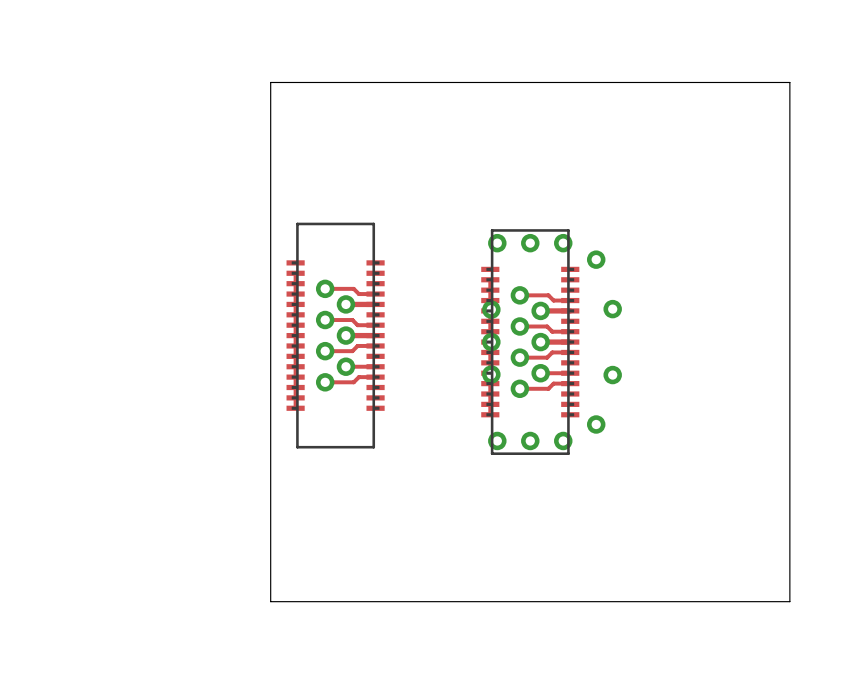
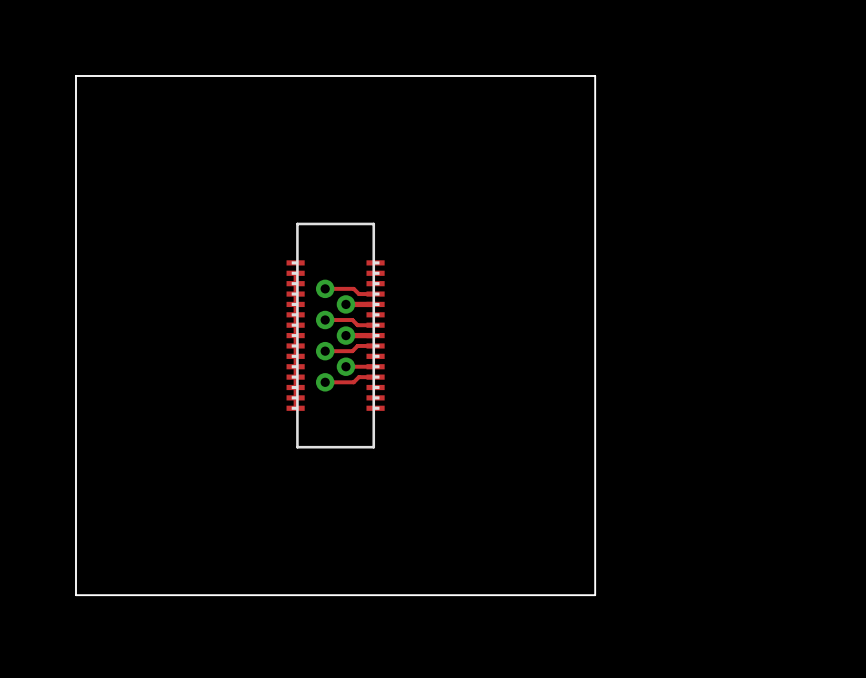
board edge: (270, 82) (789, 82) (789, 601) (270, 601) (270, 82) -> (75, 75) (595, 75) (595, 595) (75, 595) (75, 75)
part: (551, 342) -> none

